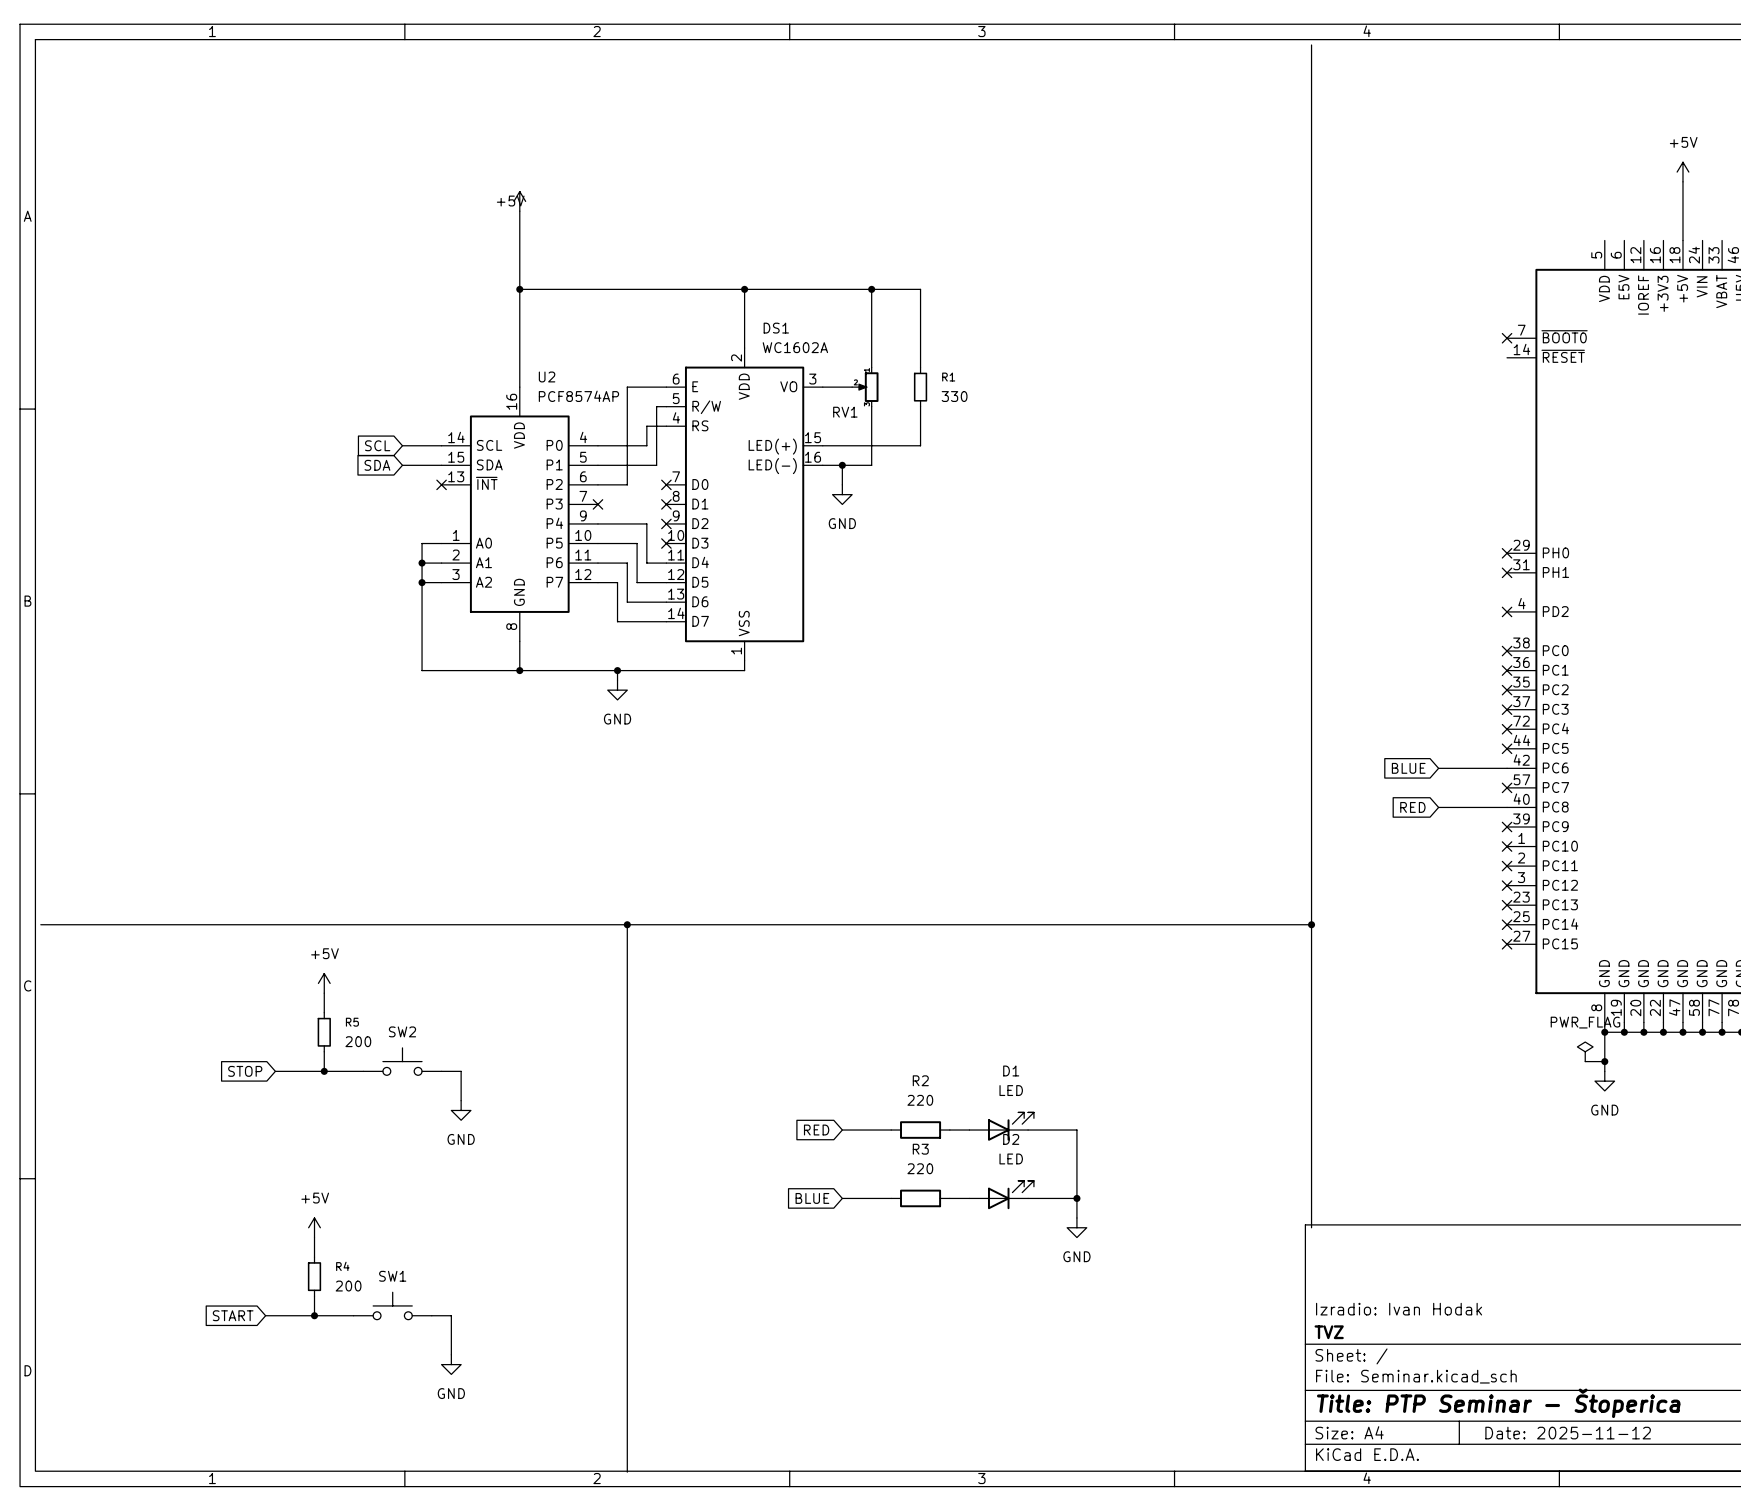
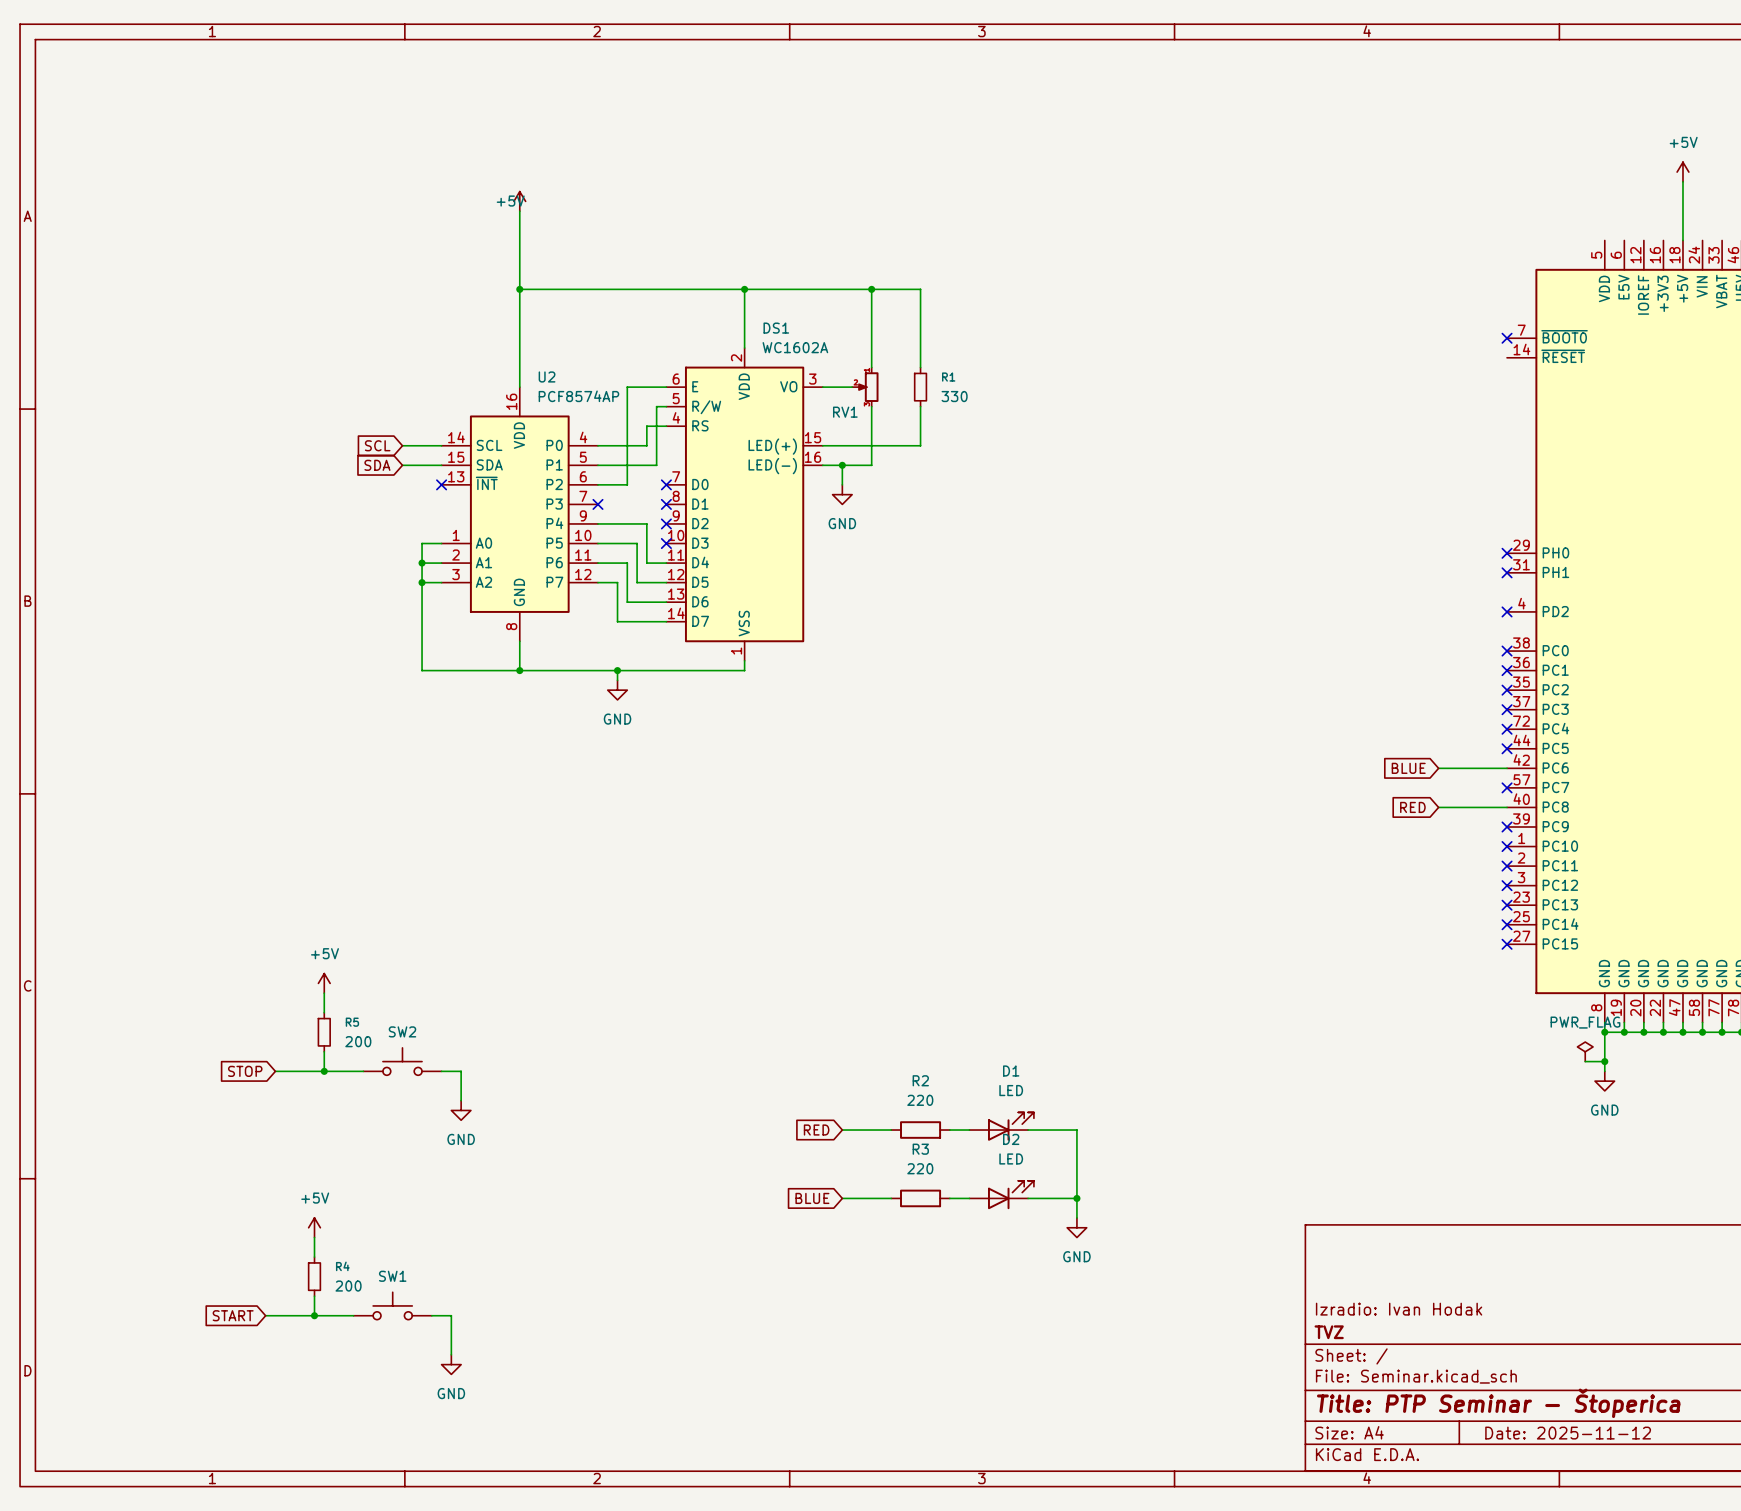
bus: (1311, 45) (1311, 1227) -> none
bus: (40, 924) (1311, 924) -> none
bus: (627, 924) (627, 1472) -> none
junction: (627, 924) -> none
junction: (1311, 924) -> none

